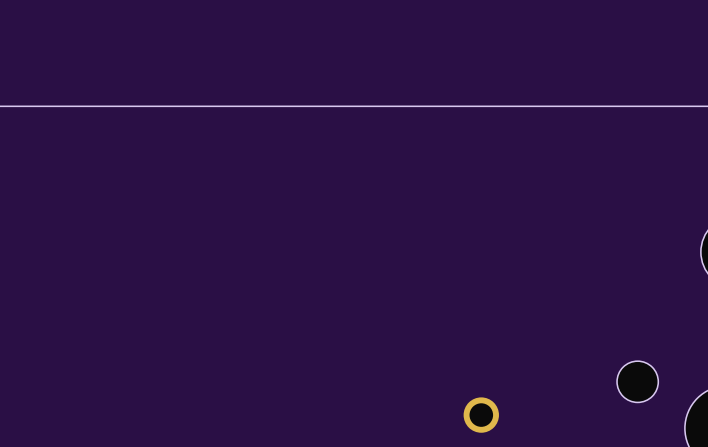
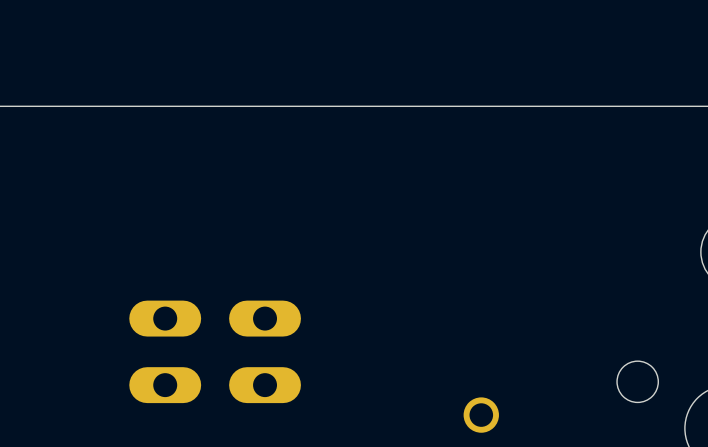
part: none -> (165, 351)
part: none -> (265, 351)

